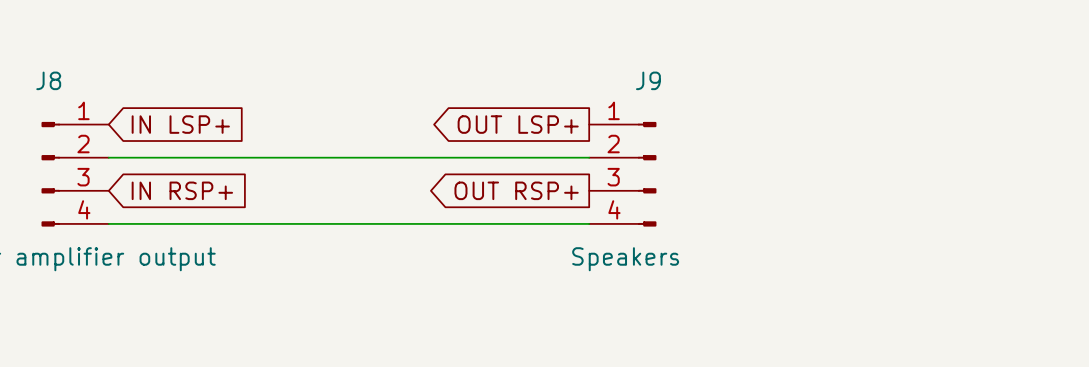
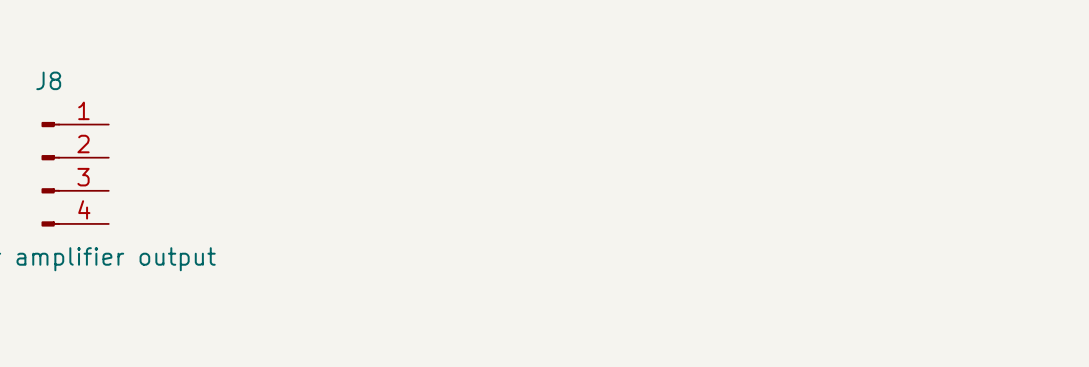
global label: IN LSP+ (180, 124) -> none
global label: OUT LSP+ (518, 124) -> none
wire: (108, 157) (589, 157) -> none
J9: Speakers (622, 174) -> none
global label: IN RSP+ (182, 190) -> none
global label: OUT RSP+ (516, 190) -> none
wire: (108, 223) (589, 223) -> none

